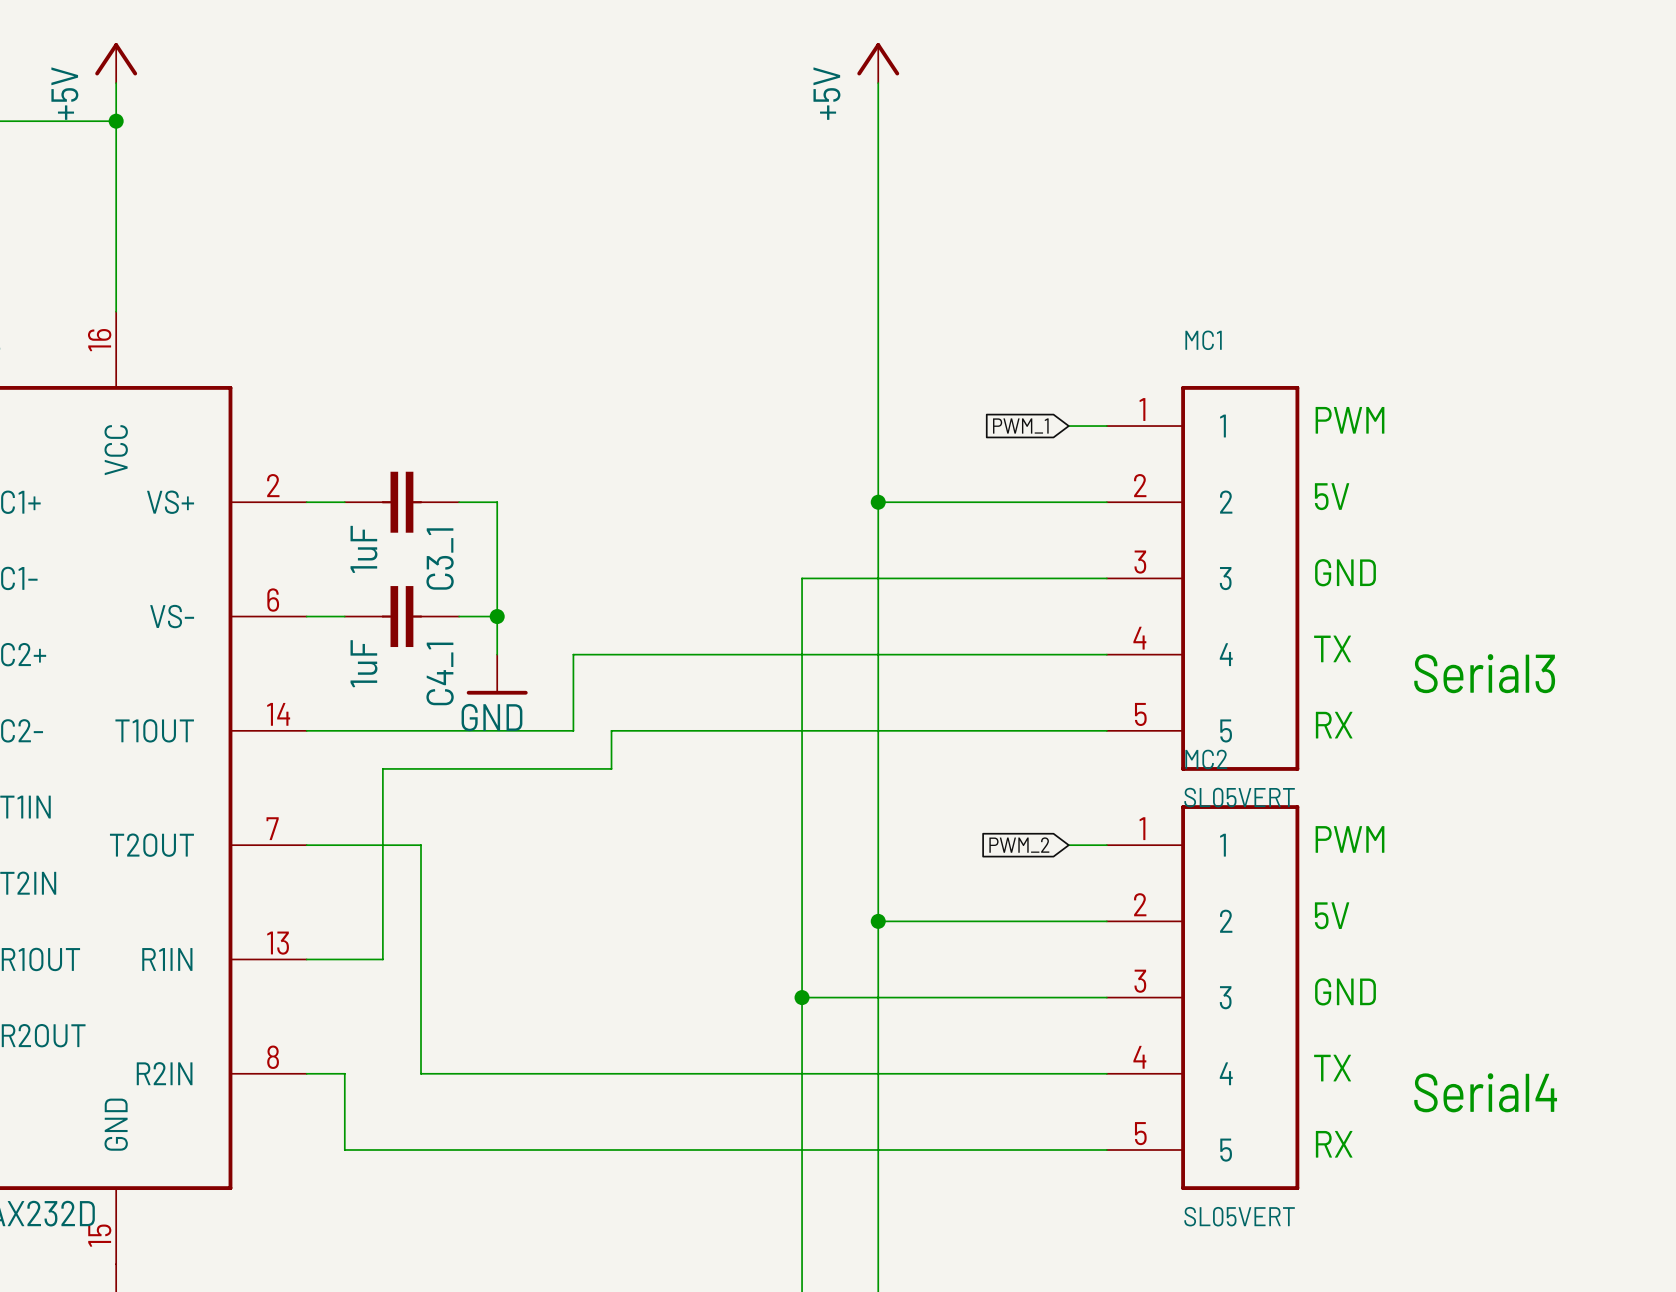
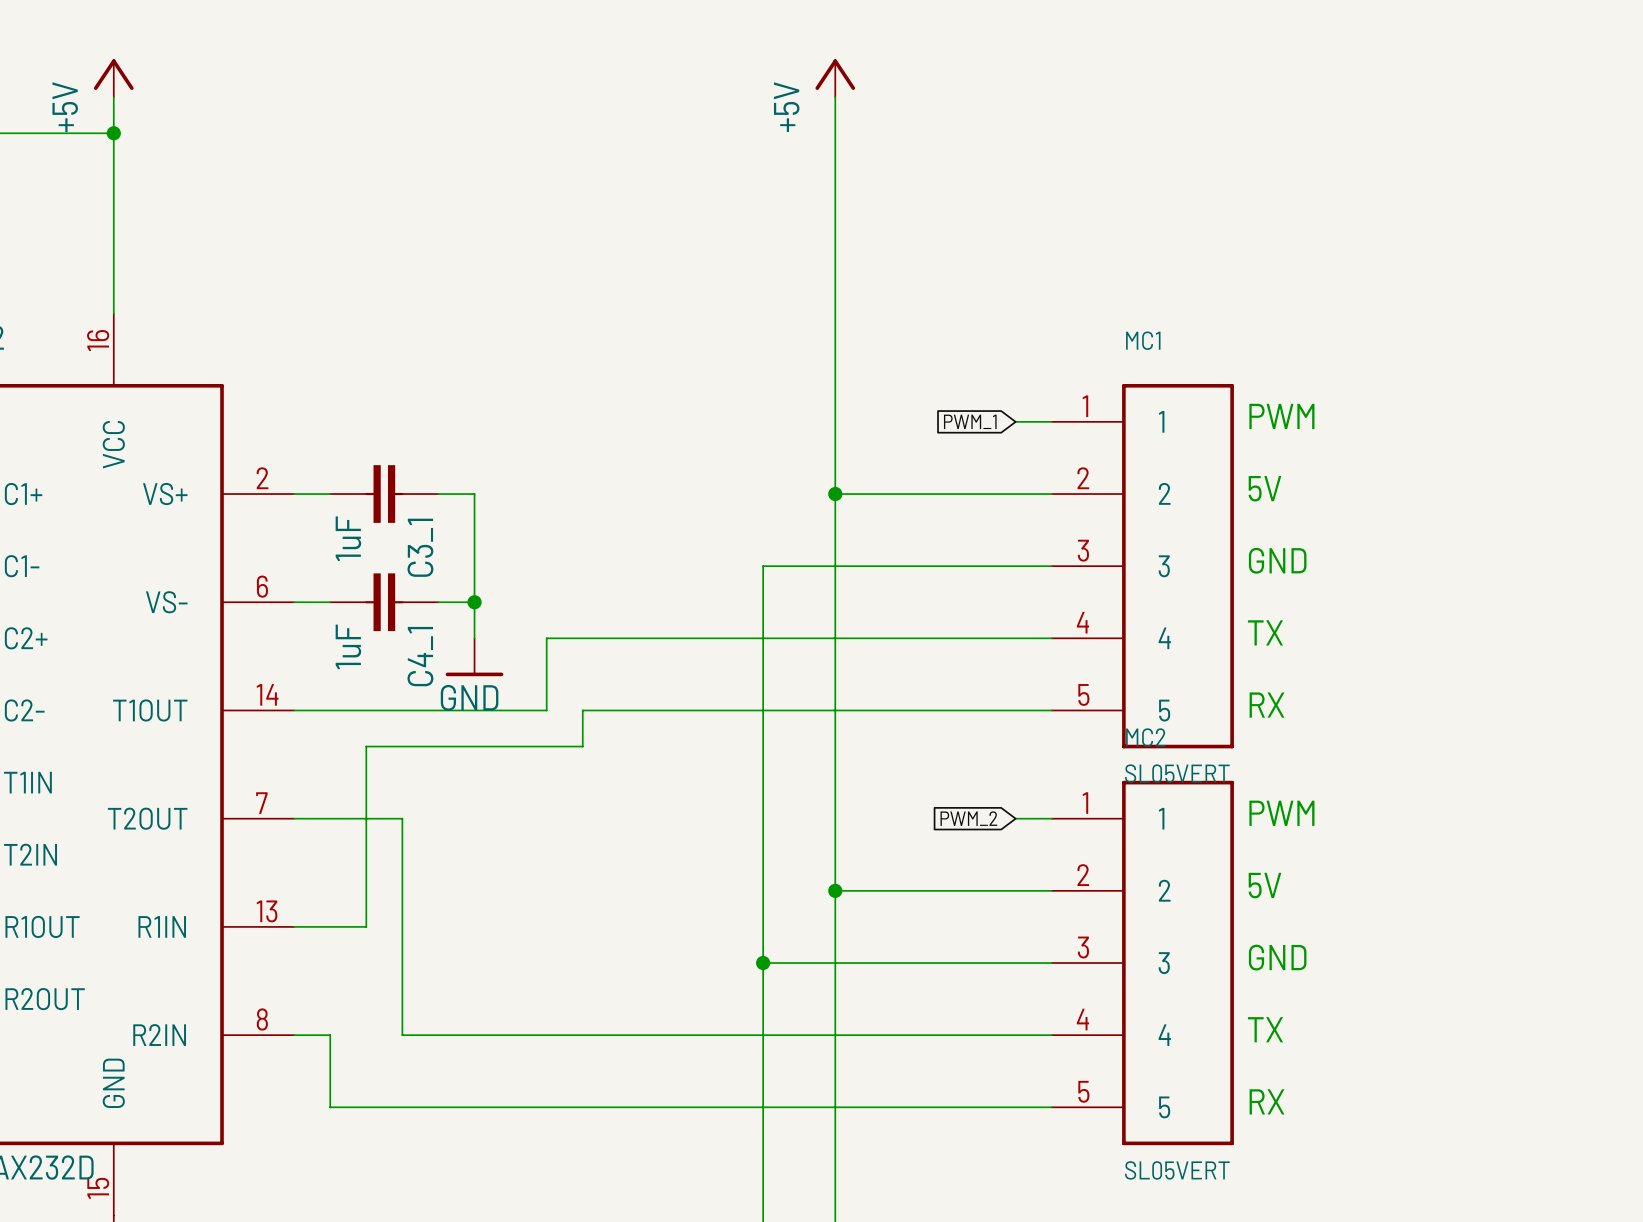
text: Serial3 (1484, 673) -> none
text: Serial4 (1485, 1092) -> none

